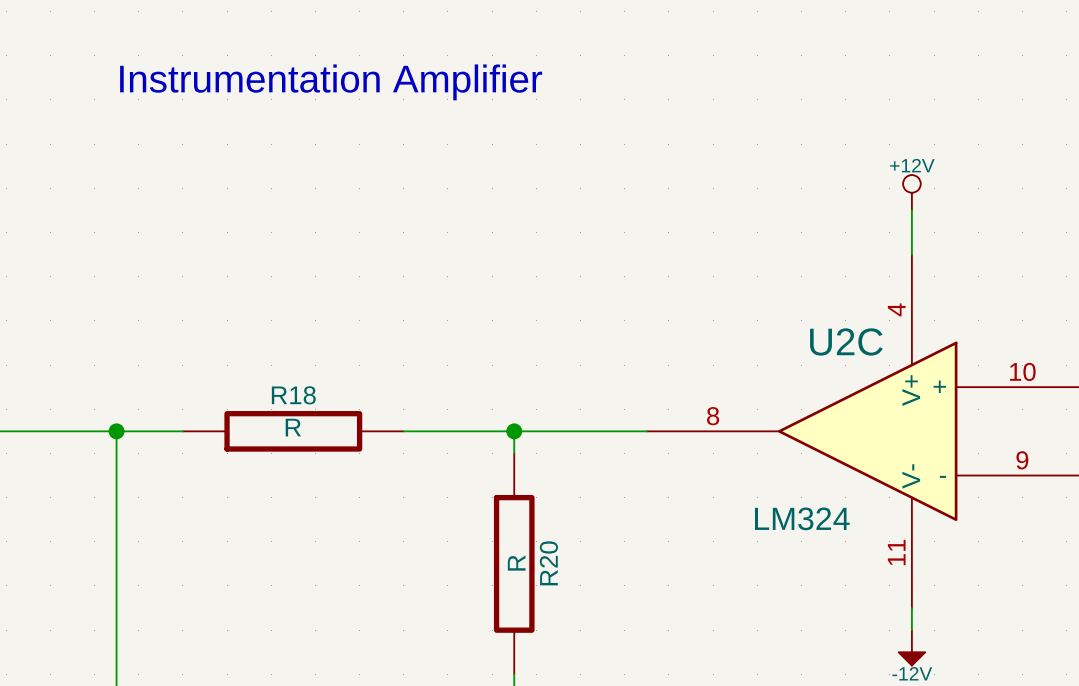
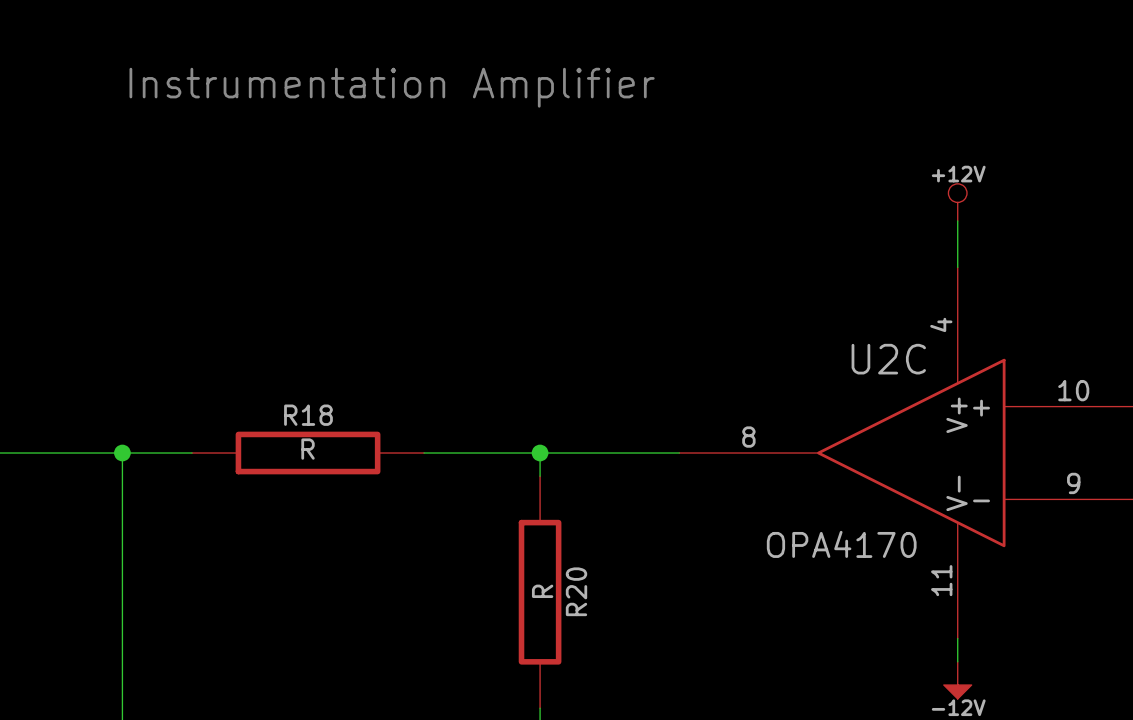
U2C value: LM324 (802, 518) -> OPA4170 (841, 544)

